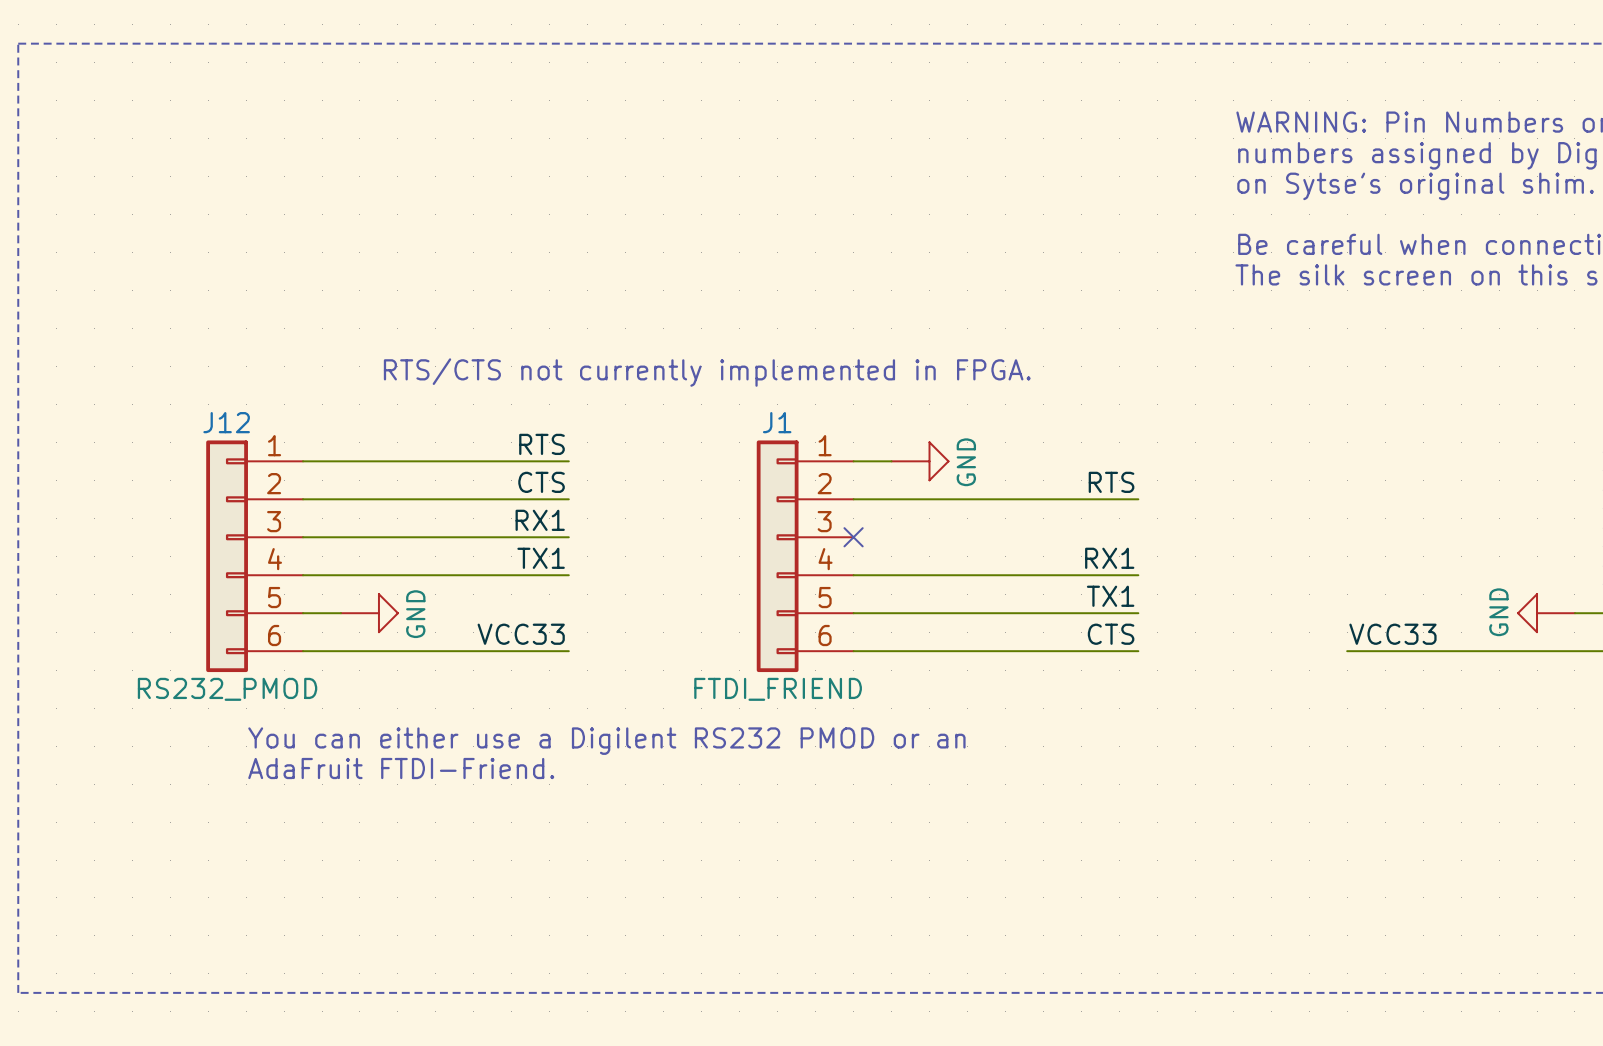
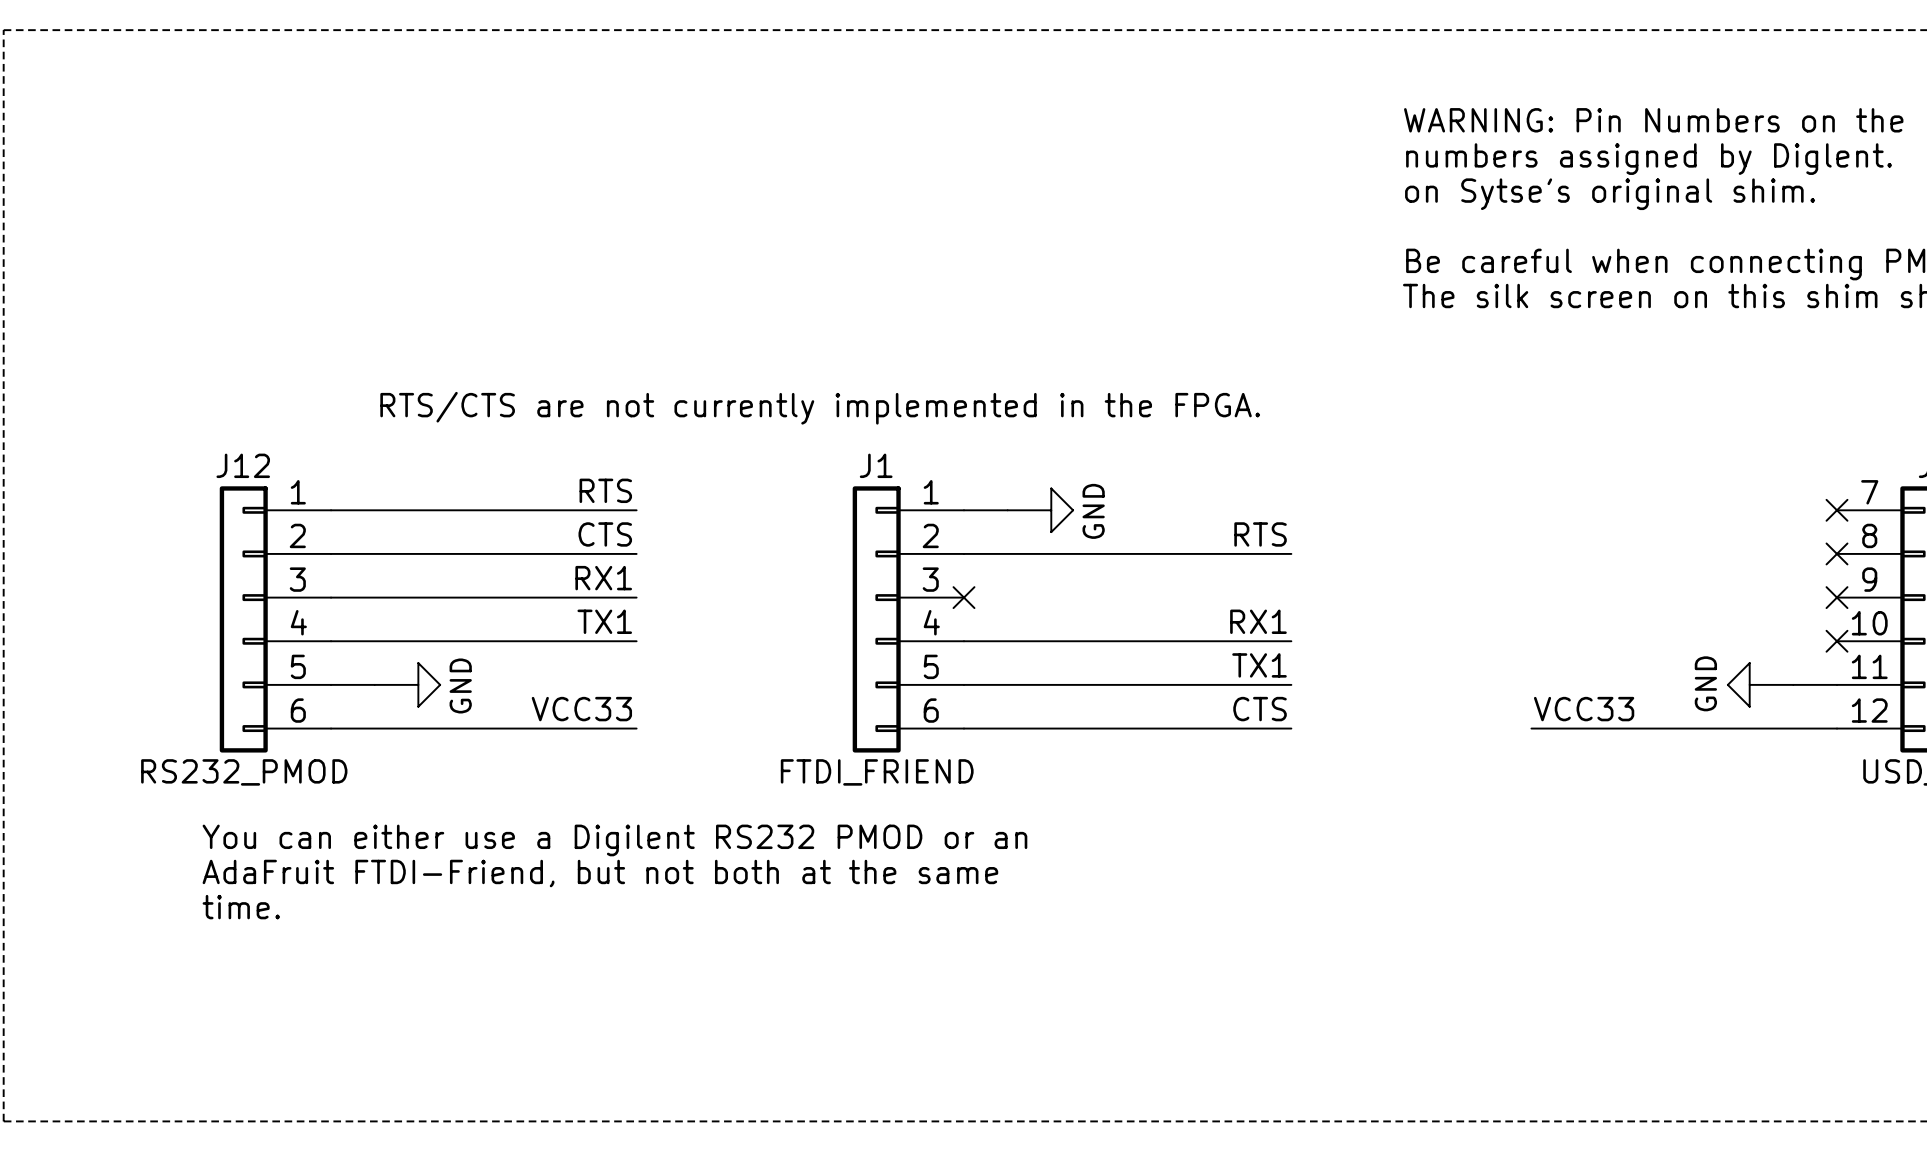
text: RTS/CTS not currently implemented in FPGA. (707, 372) -> RTS/CTS are not currently implemented in the FPGA. (820, 408)
text position: You can either use a Digilent RS232 PMOD or an (606, 741) -> You can either use a Digilent RS232 PMOD or an (614, 840)
text: AdaFruit FTDI-Friend. (401, 768) -> none
text: none -> AdaFruit FTDI-Friend, but not both at the same (600, 873)
text: none -> time. (241, 907)

